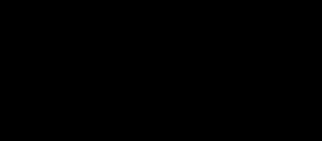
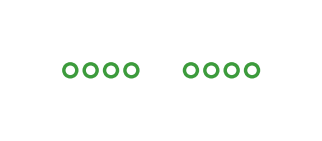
part: none -> (100, 70)
part: none -> (221, 70)

